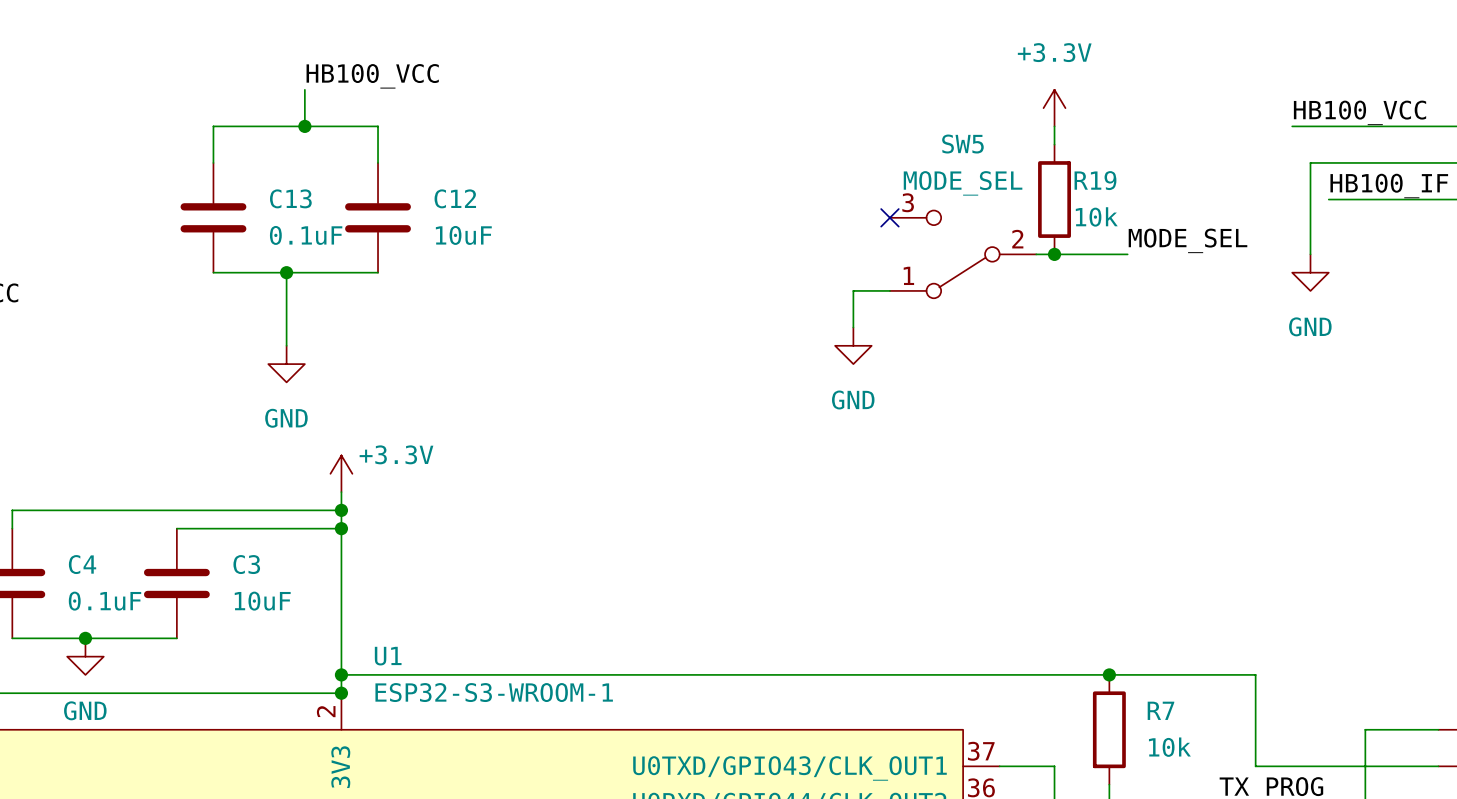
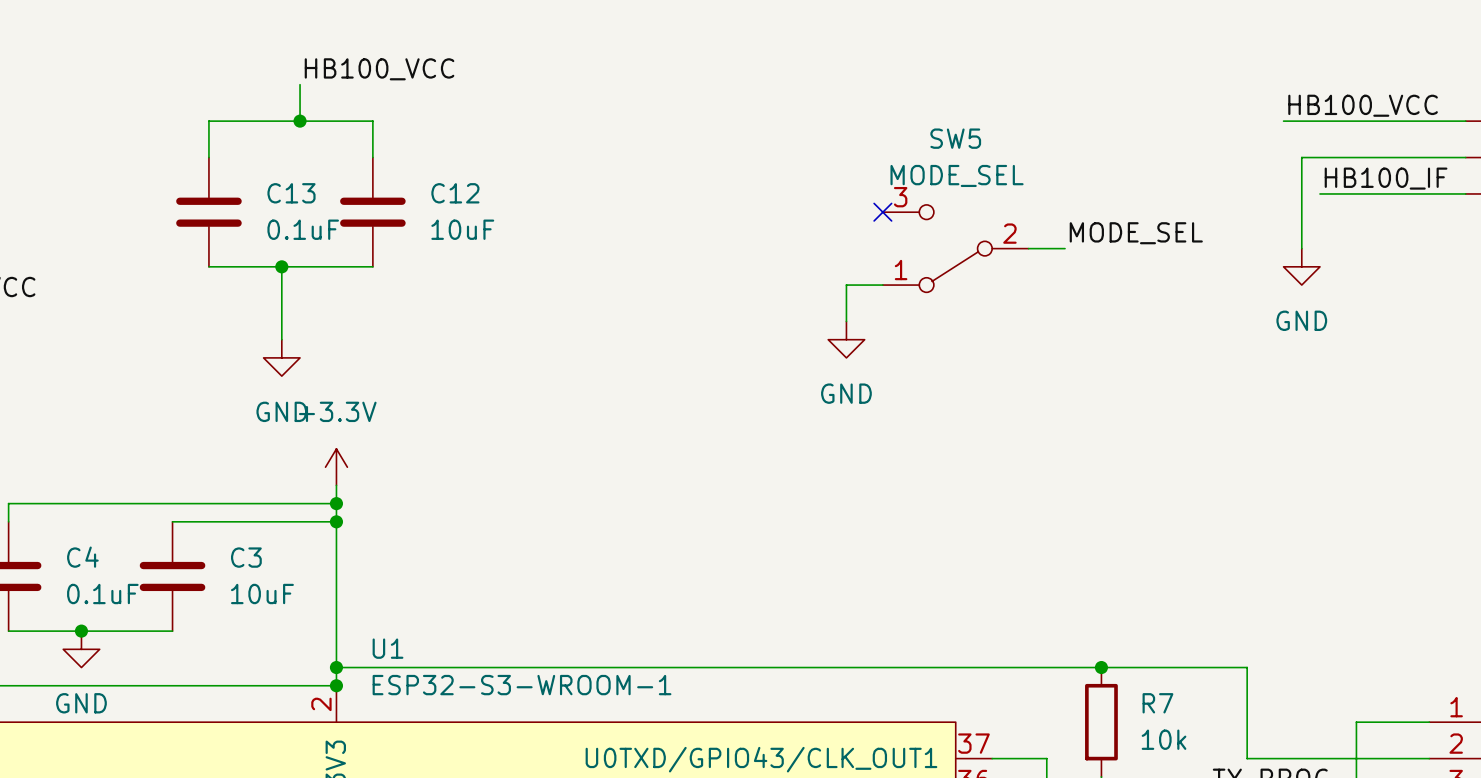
power symbol: +3.3V (1054, 108) -> none
wire: (1054, 126) (1054, 144) -> none
R19: 10k (1054, 199) -> none
label position: MODE_SEL (1188, 240) -> MODE_SEL (1136, 233)
junction: (1054, 254) -> none
wire: (1072, 254) (1127, 254) -> none
power symbol text position: +3.3V (396, 454) -> +3.3V (337, 411)

